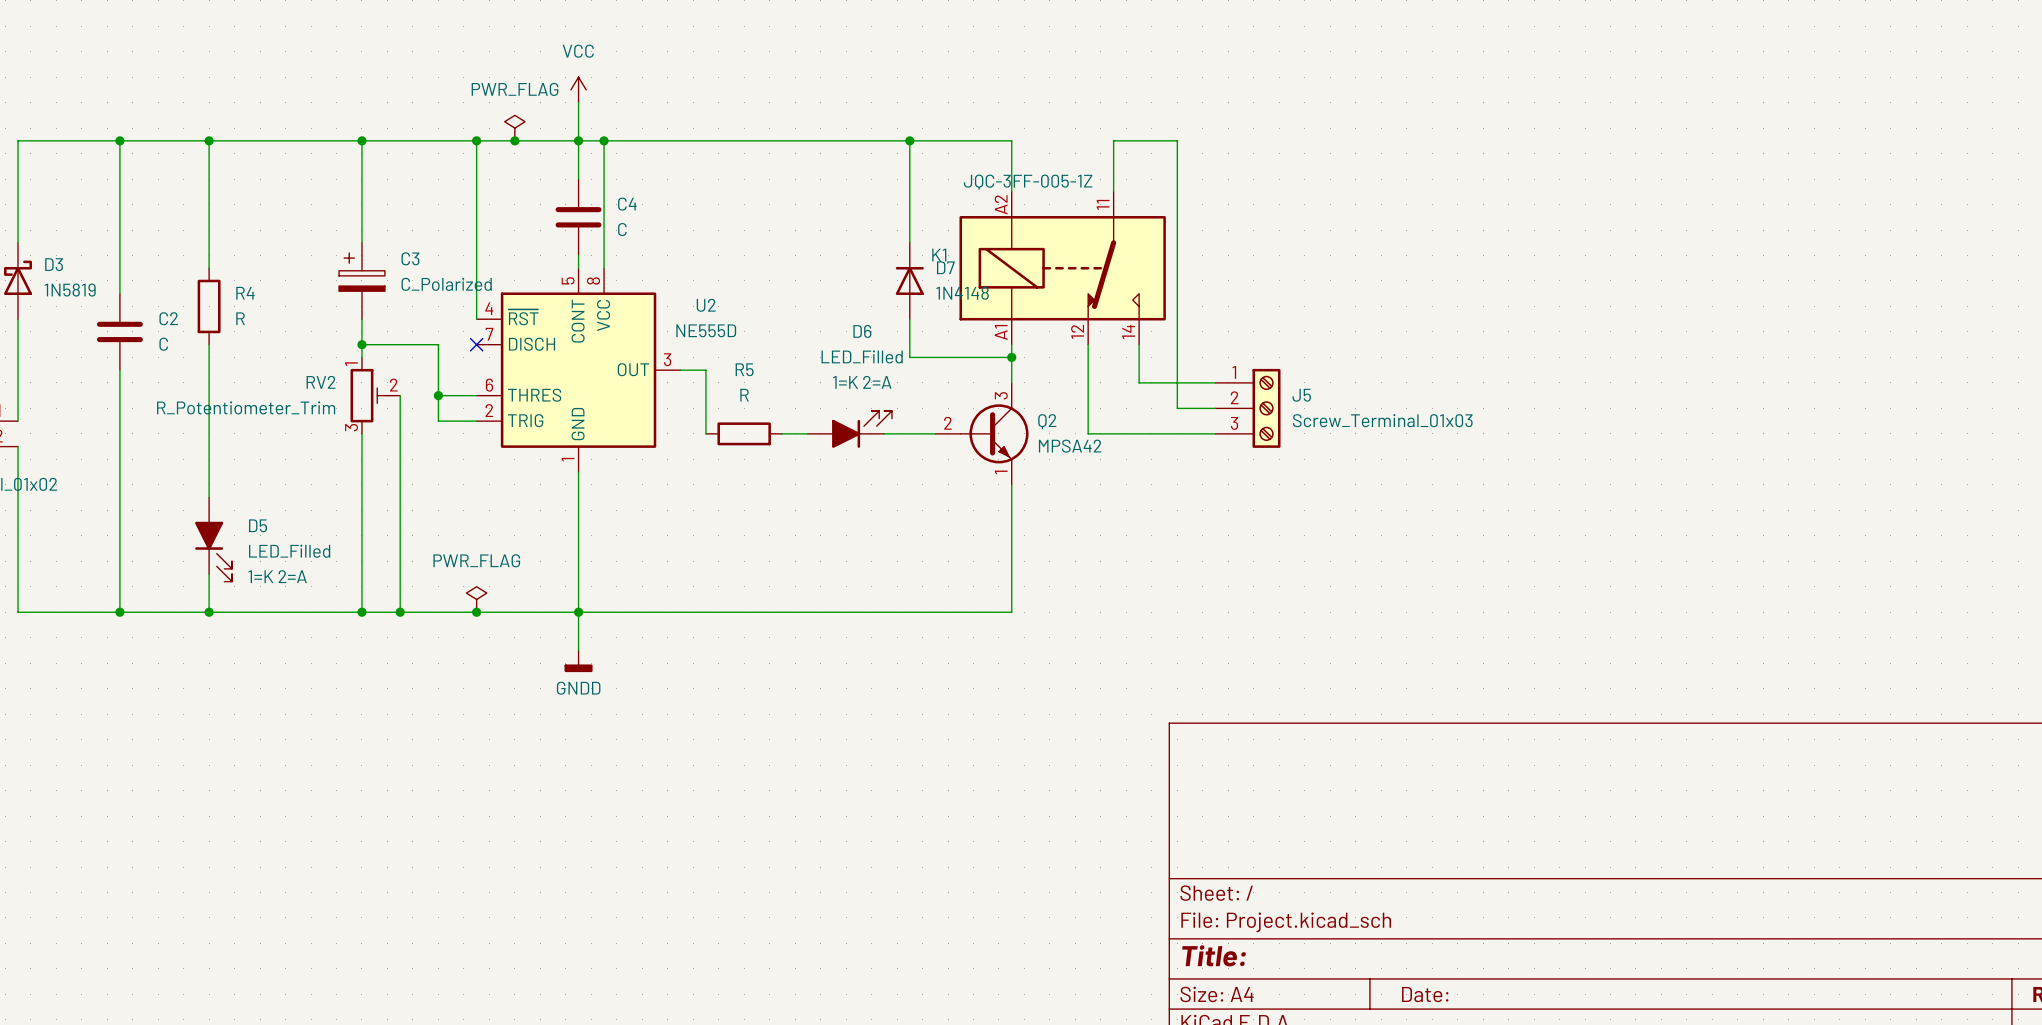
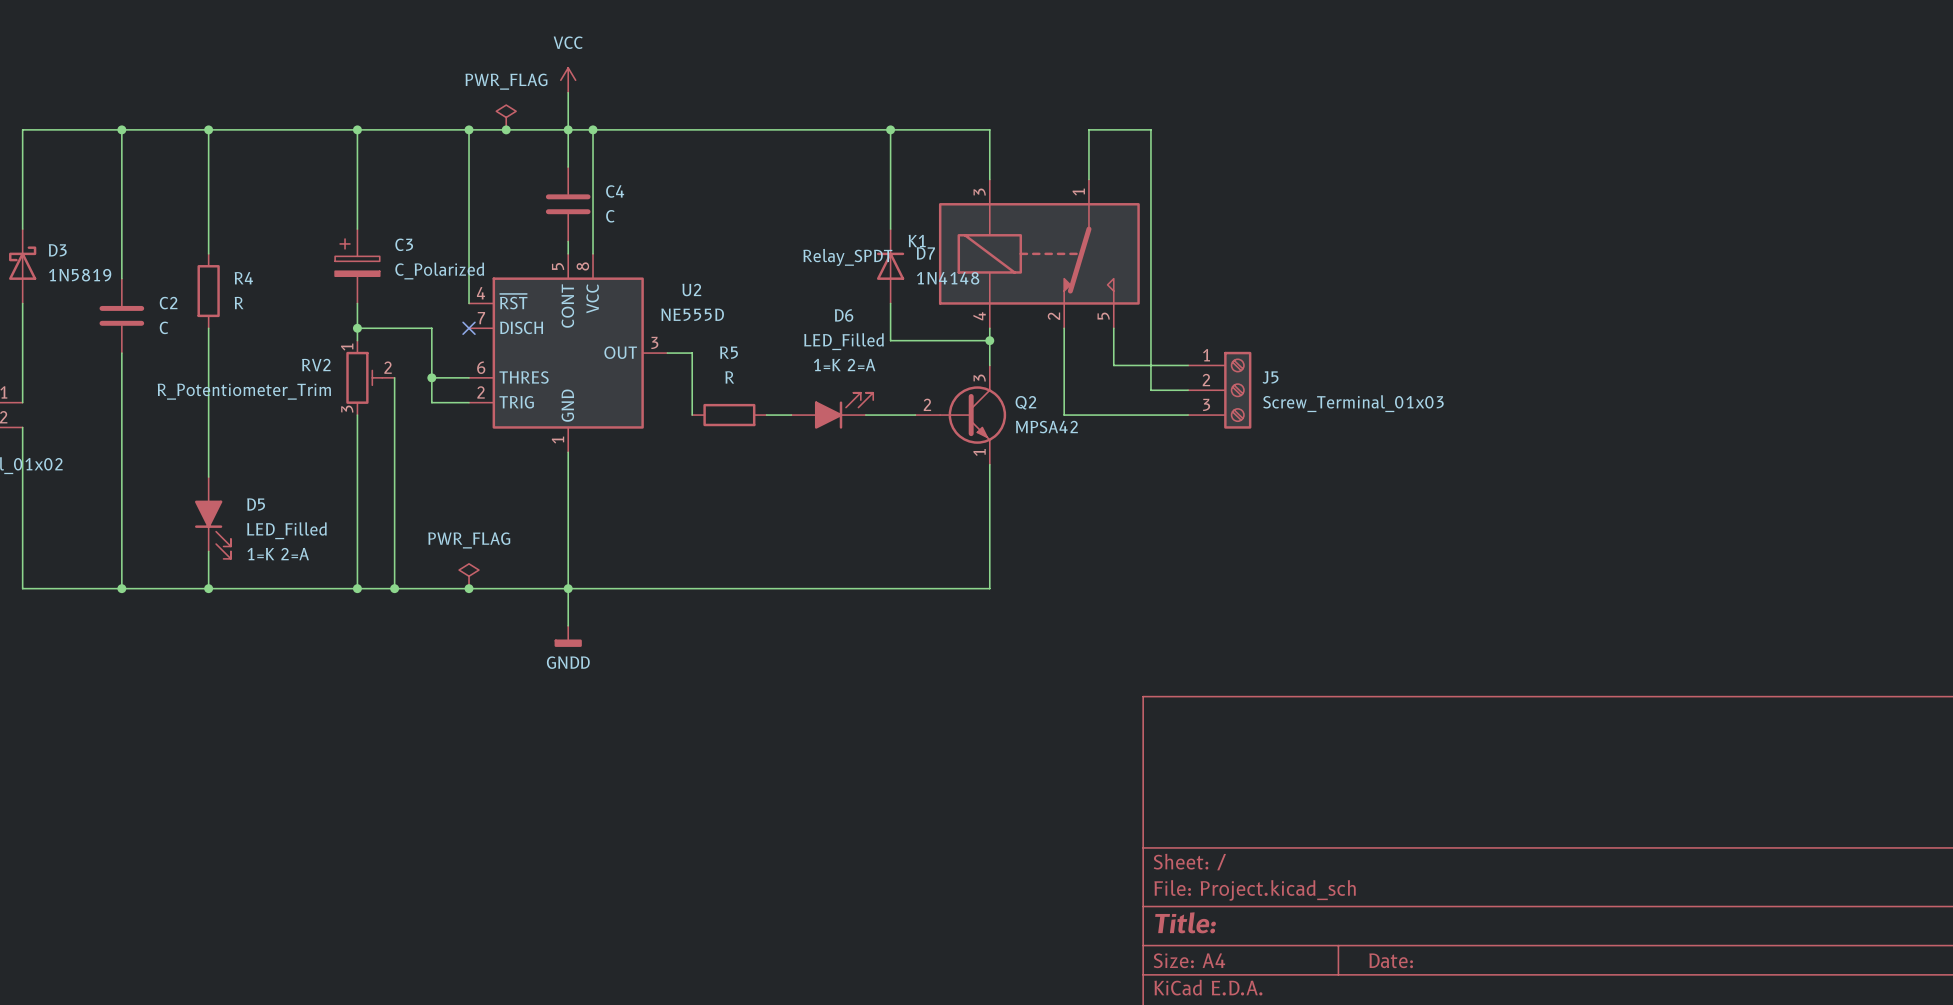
K1 value: JQC-3FF-005-1Z (1028, 182) -> Relay_SPDT (847, 257)
K1 pin number: A2 (1001, 204) -> 3 (979, 192)
K1 pin number: 11 (1103, 204) -> 1 (1078, 192)
K1 pin number: 12 (1077, 331) -> 2 (1053, 316)
K1 pin number: 14 (1128, 331) -> 5 (1103, 316)
K1 pin number: A1 (1001, 332) -> 4 (979, 316)

